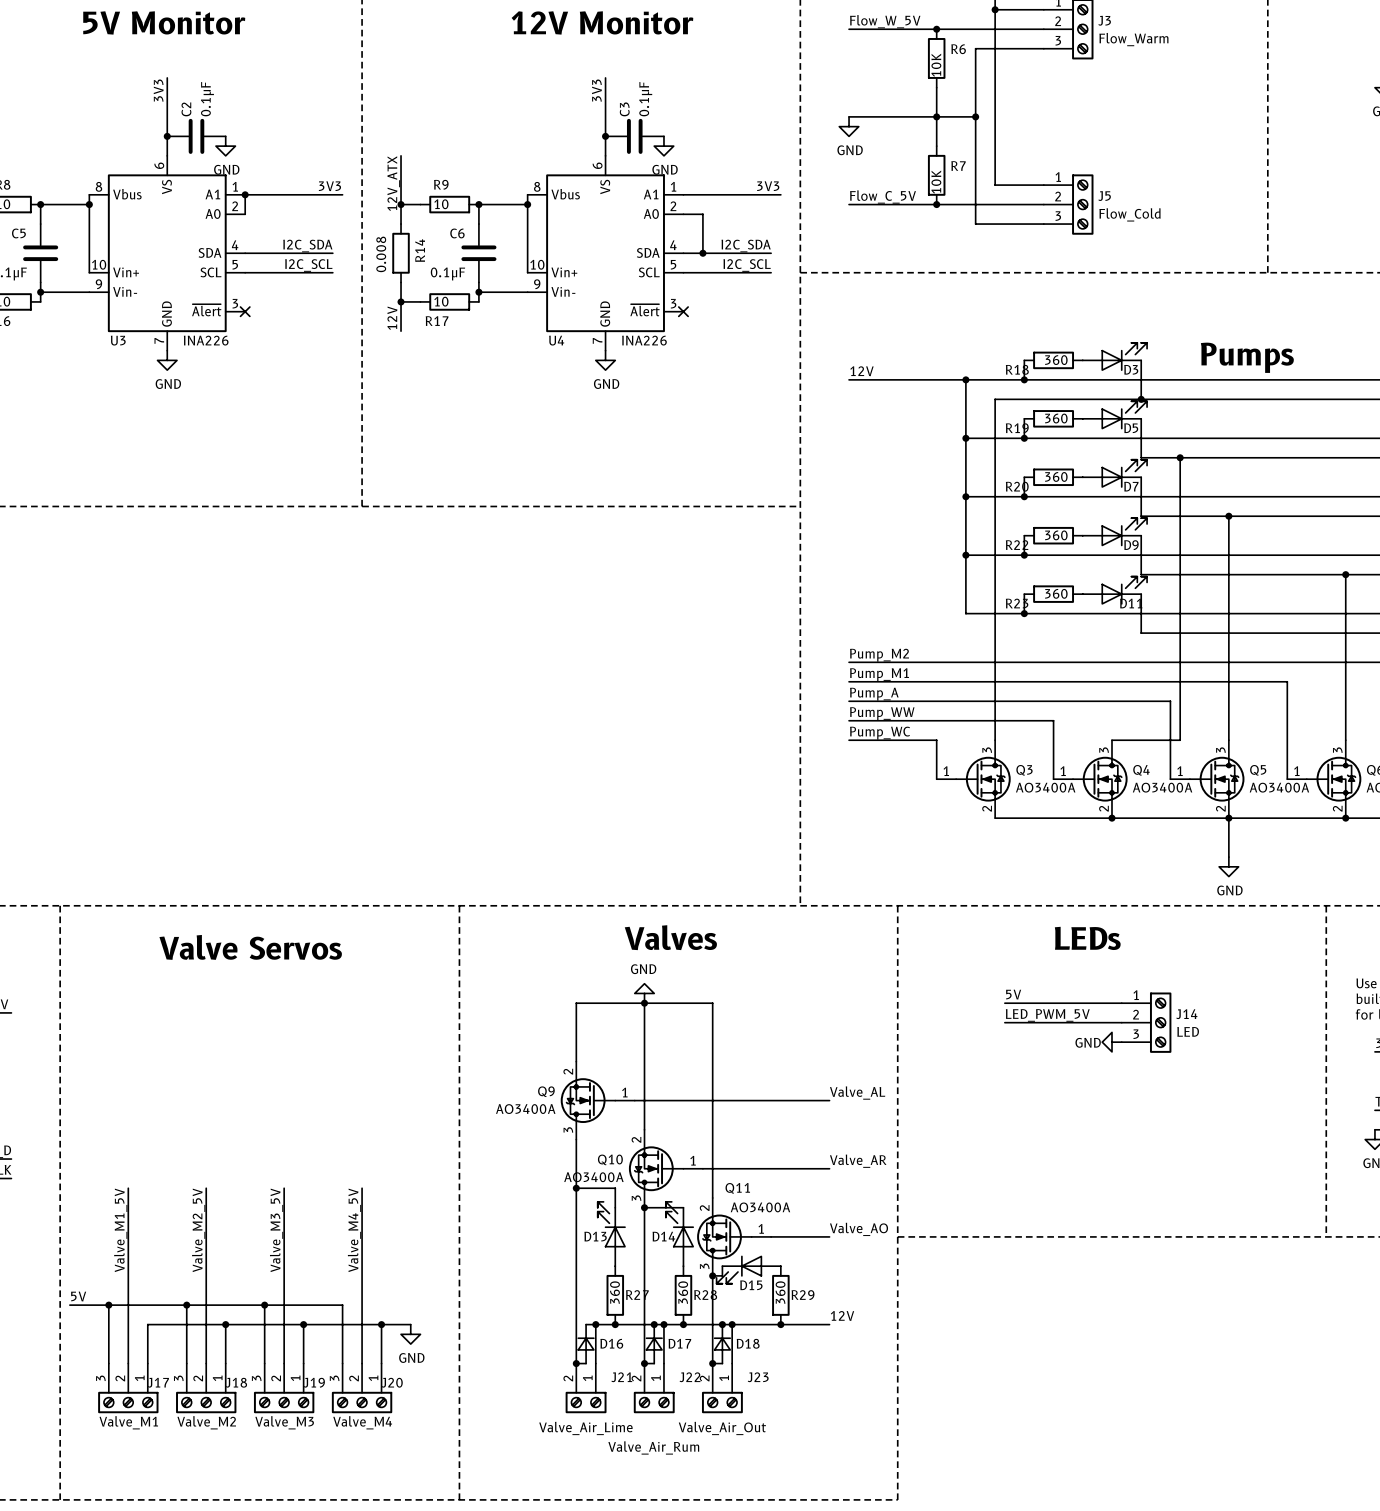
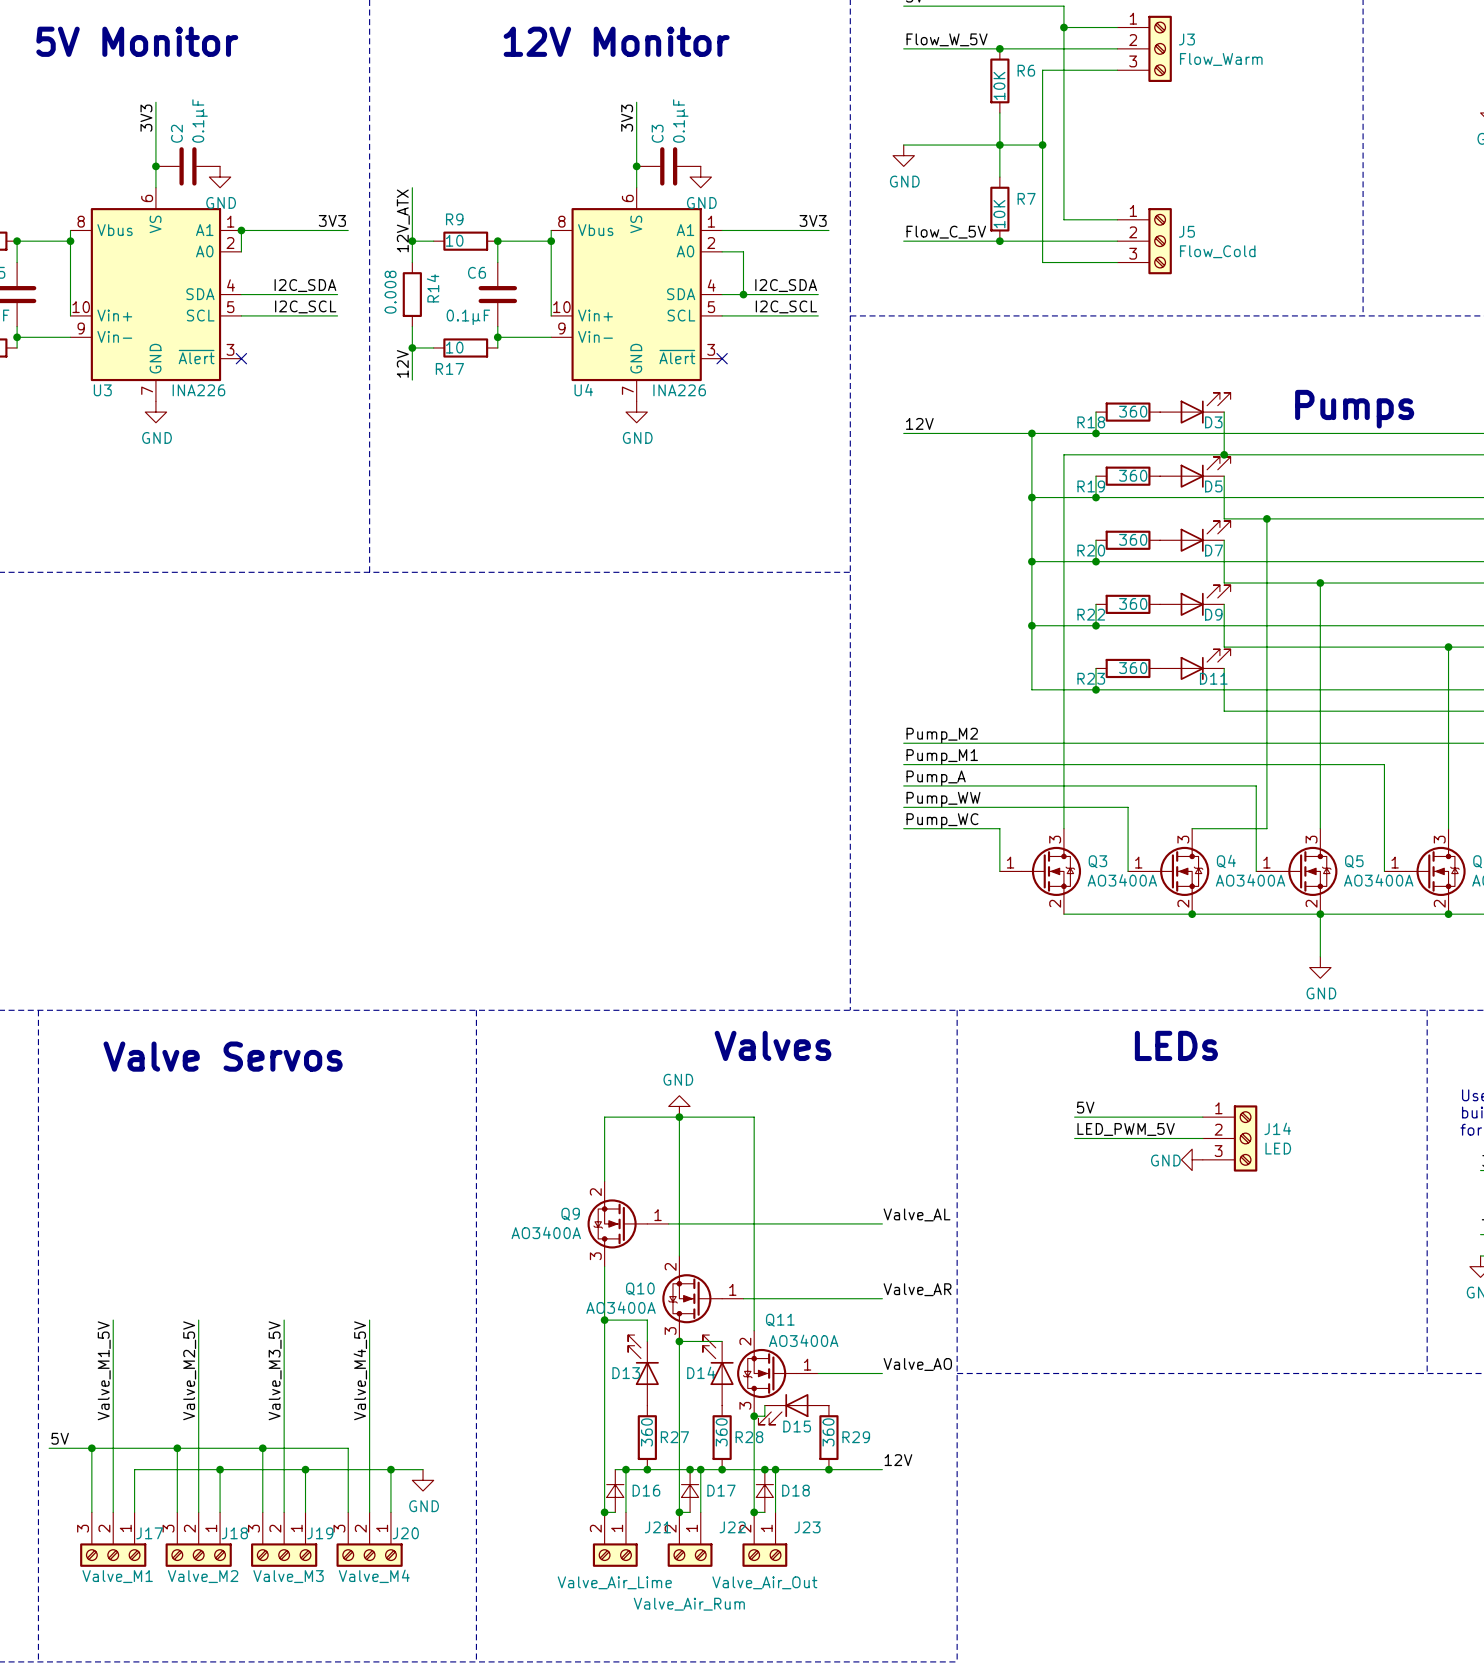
text position: Valves (670, 937) -> Valves (772, 1045)

